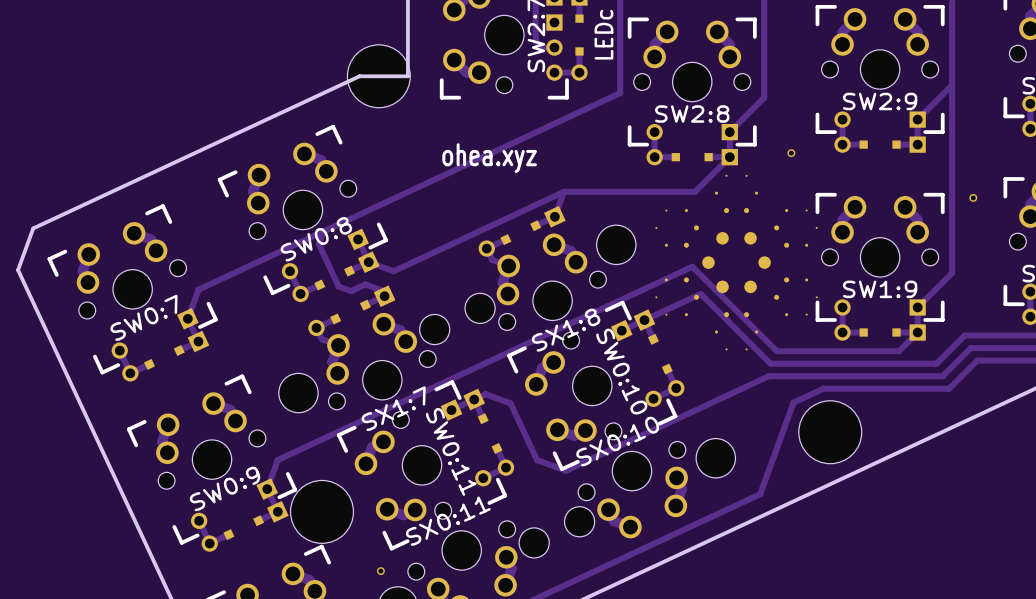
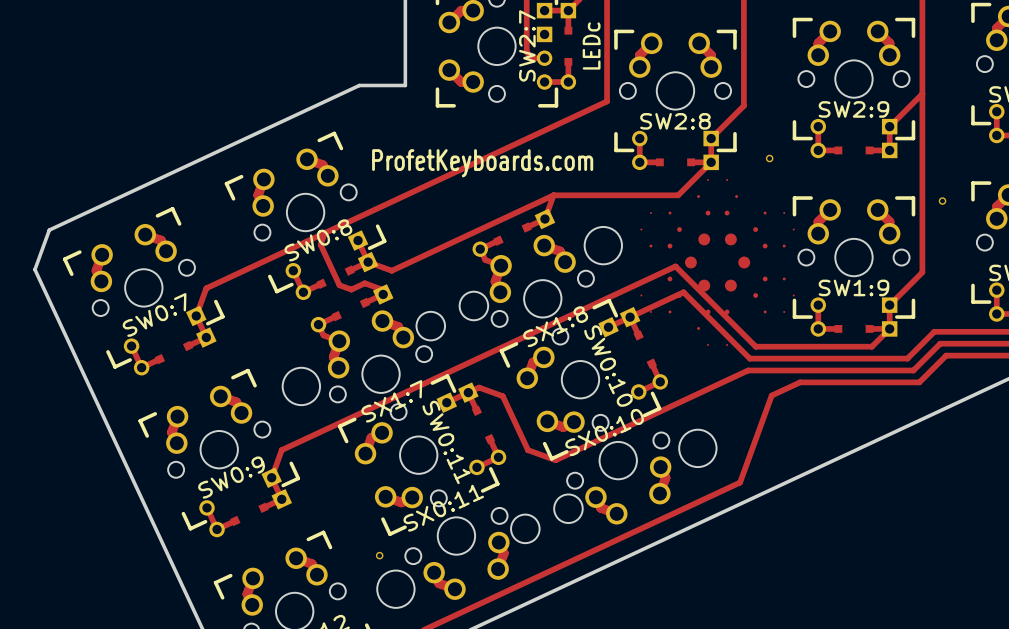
part: (378, 76) -> none
text: ohea.xyz (489, 158) -> ProfetKeyboards.com (482, 163)
part: (830, 432) -> none
part: (322, 511) -> none

